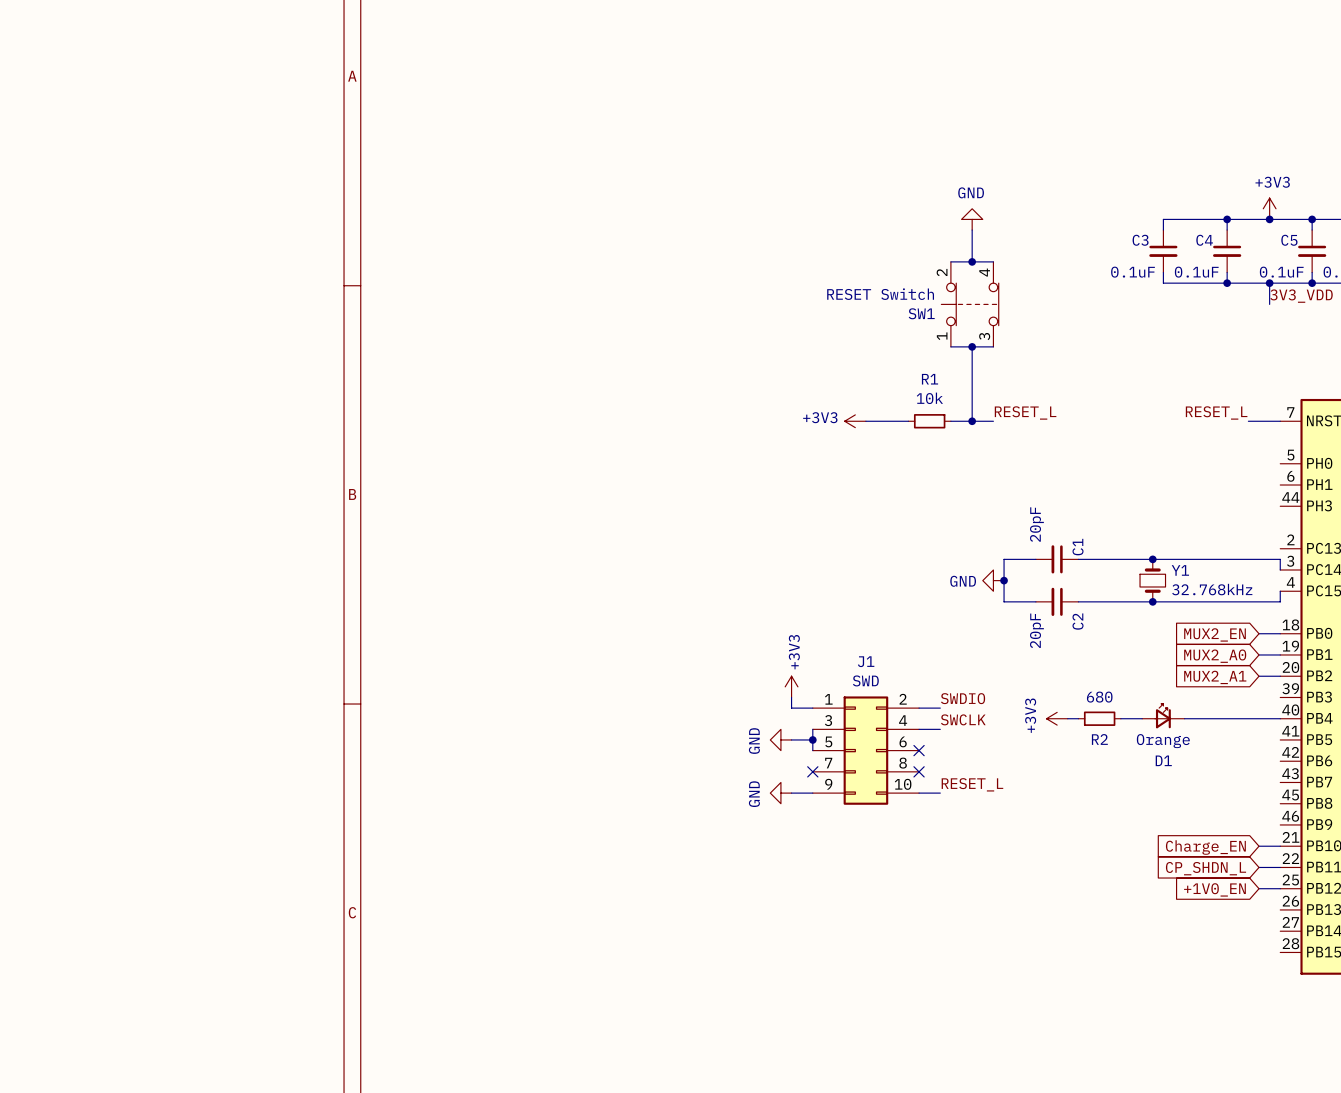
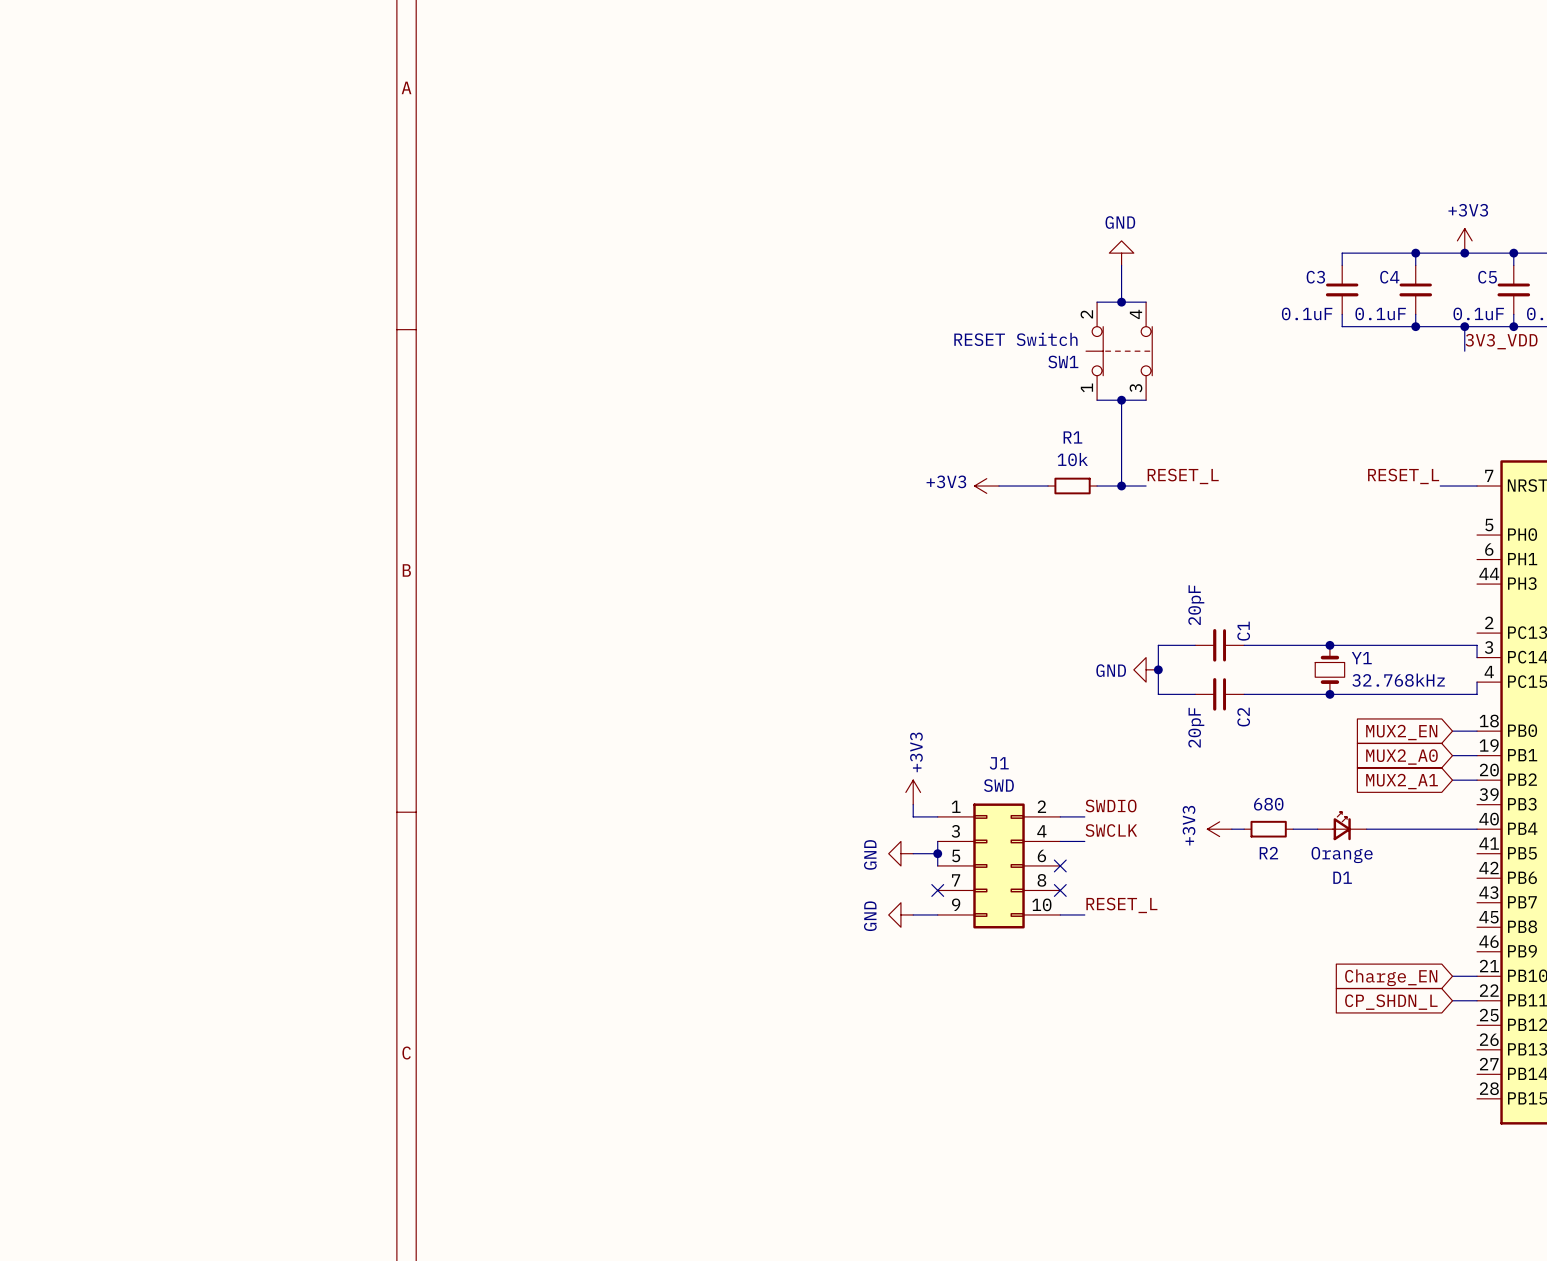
wire: (1259, 888) (1280, 888) -> none
global label: +1V0_EN (1214, 889) -> none

